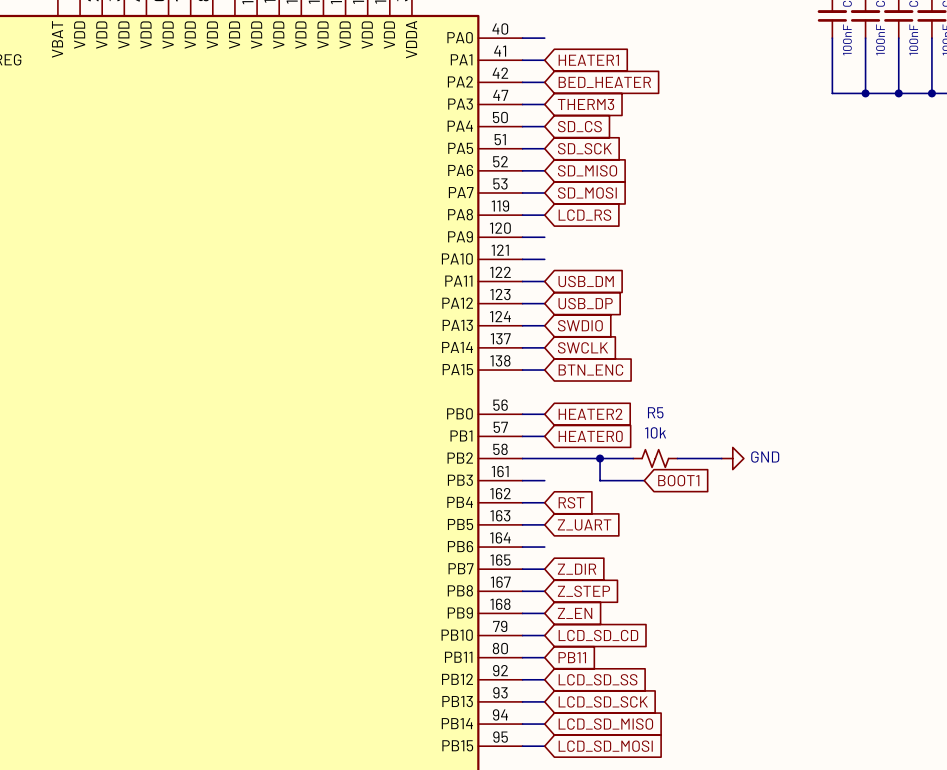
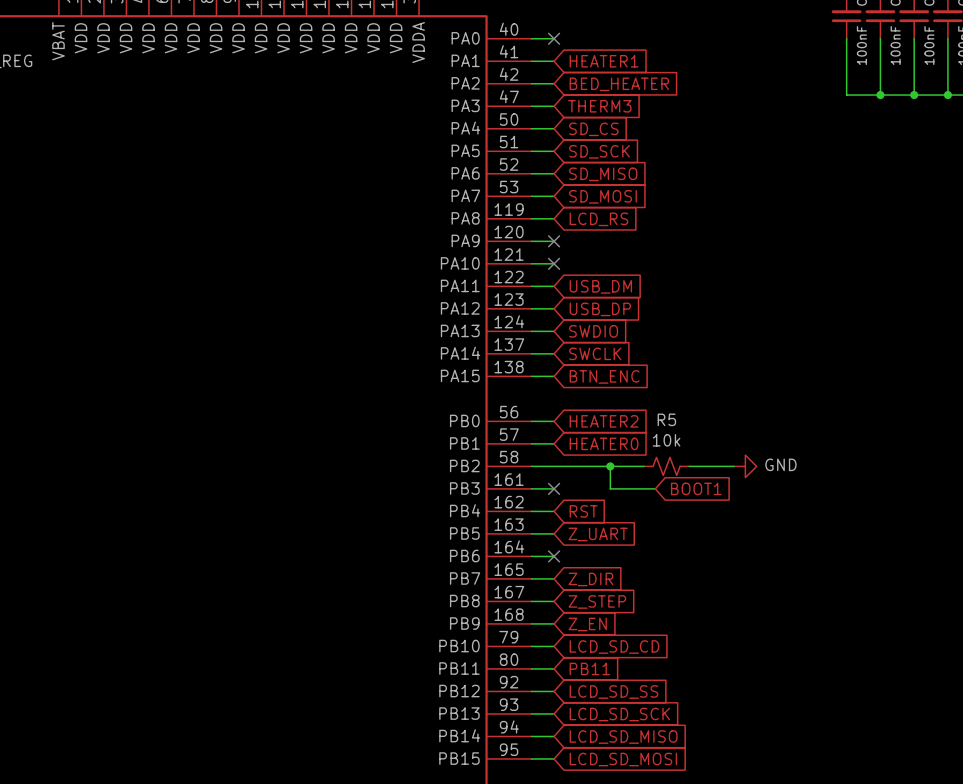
no-connect mark: none -> (554, 38)
no-connect mark: none -> (554, 241)
no-connect mark: none -> (554, 263)
no-connect mark: none -> (554, 488)
no-connect mark: none -> (554, 556)

